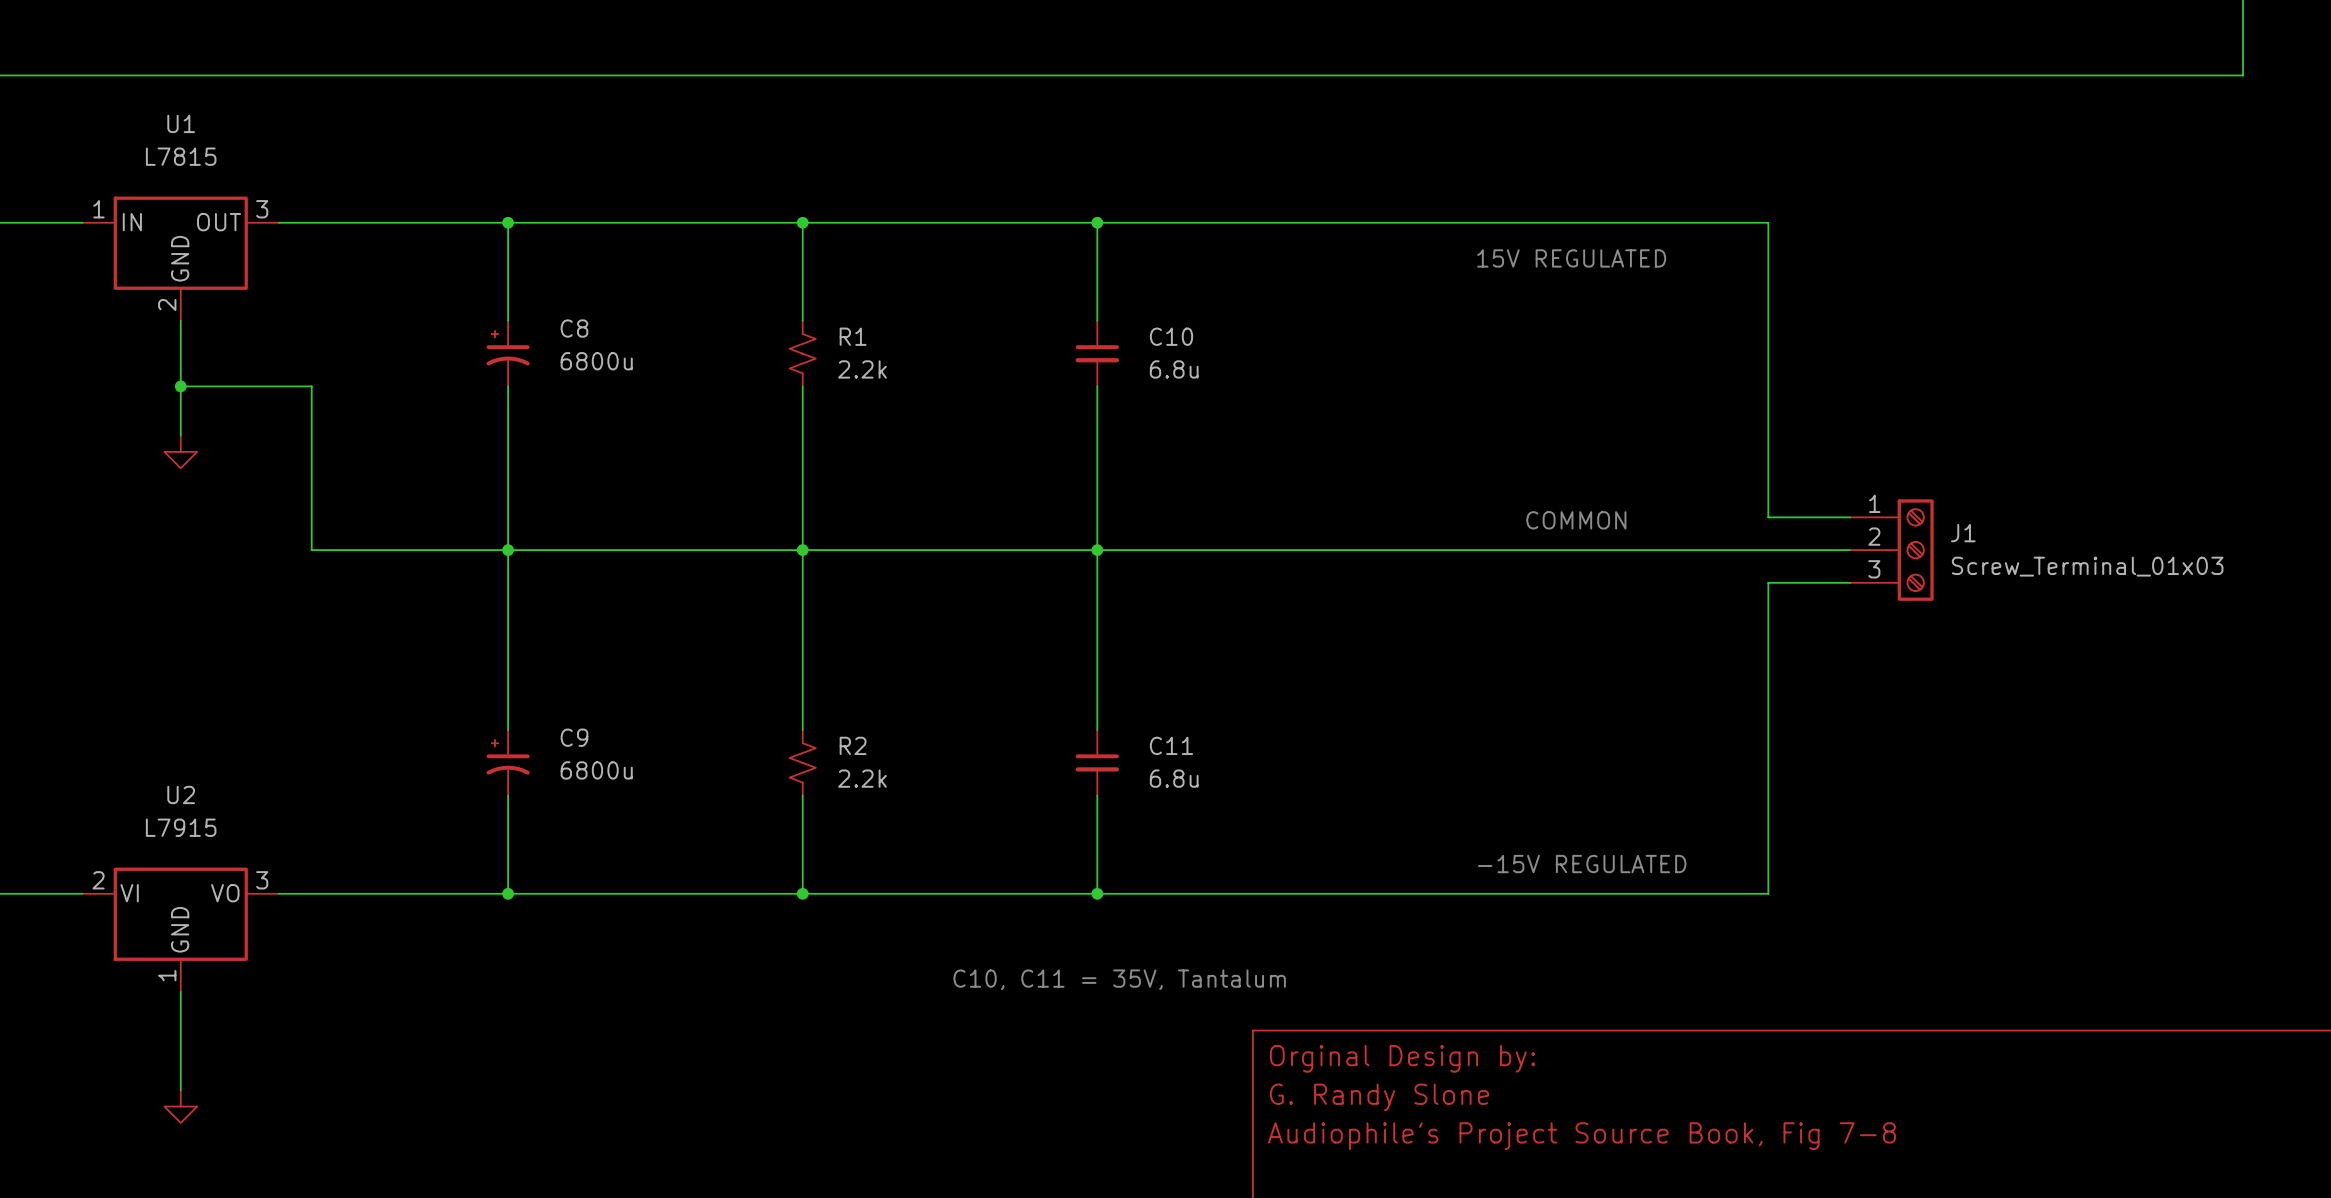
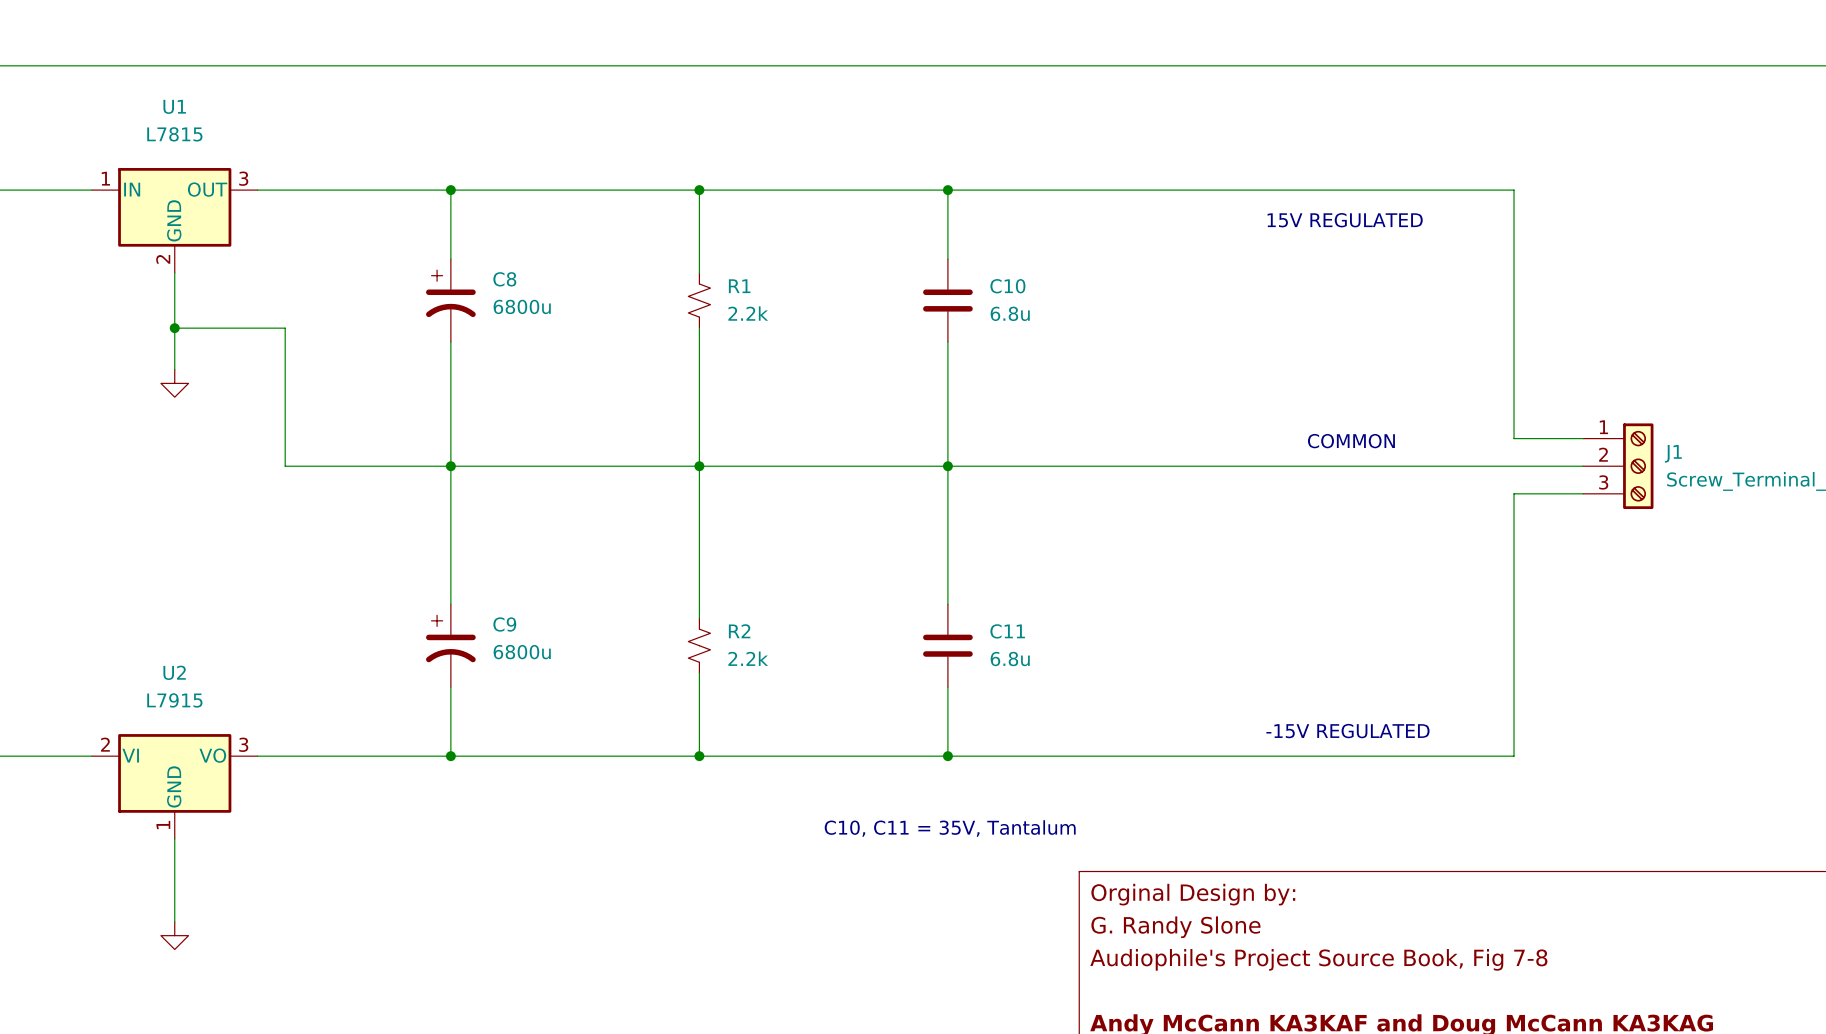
C8 symbol: [486, 320, 530, 387] -> [426, 259, 476, 342]
C10 symbol: [1075, 320, 1120, 387] -> [923, 259, 973, 342]
C9 symbol: [486, 730, 530, 796] -> [426, 604, 476, 688]
C11 symbol: [1075, 730, 1120, 796] -> [923, 604, 973, 688]

